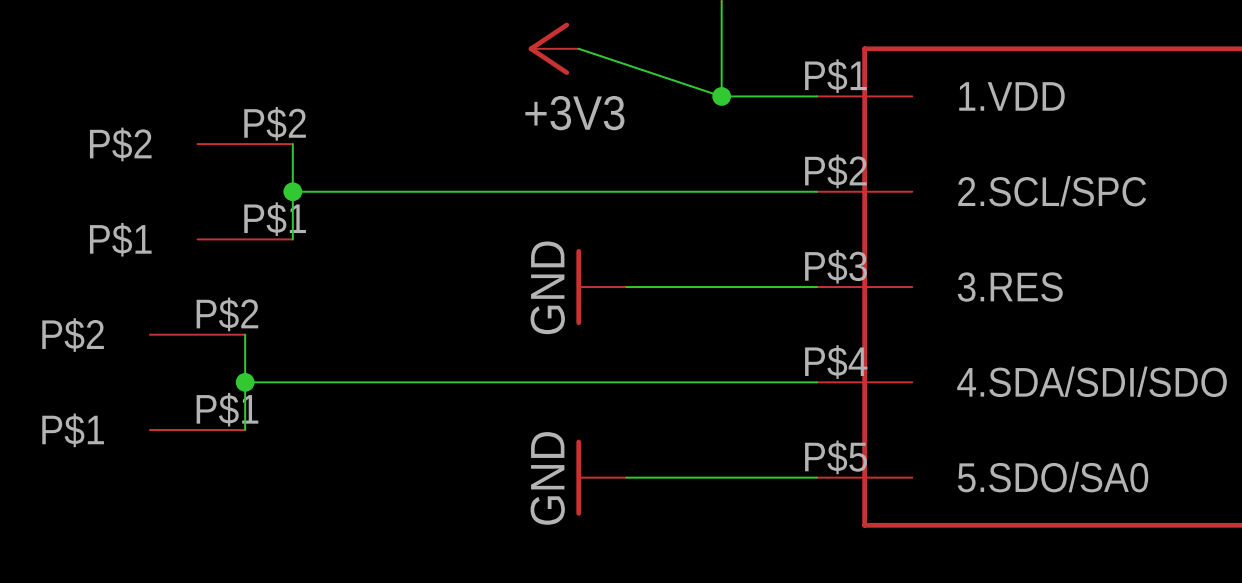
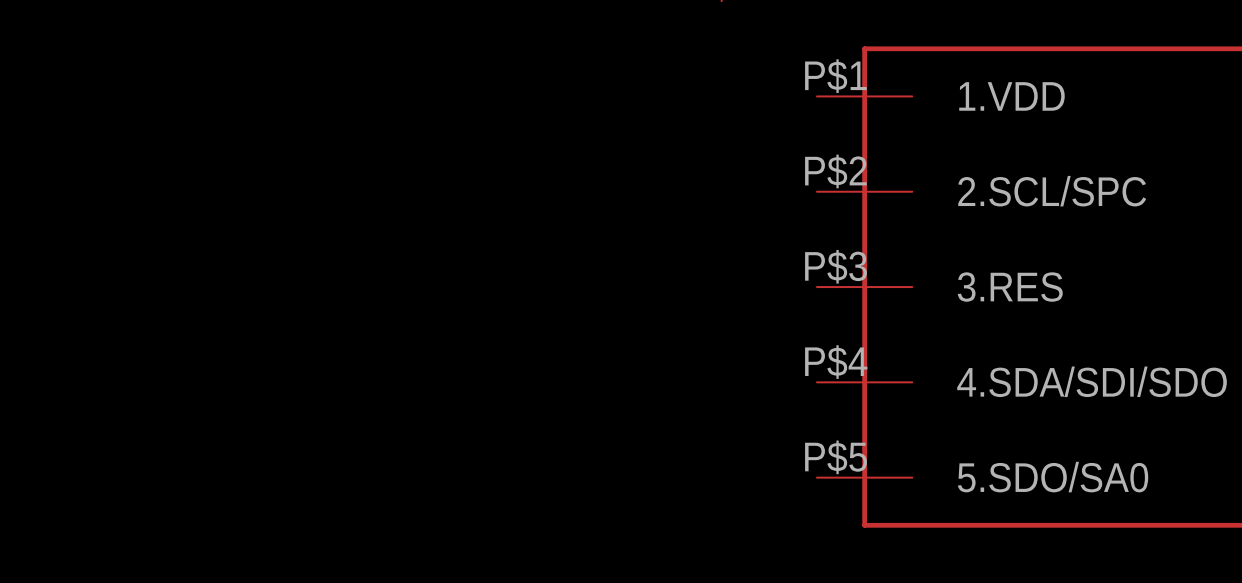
wire: (721, 1) (721, 96) -> none
power symbol: +3V3 (553, 48) -> none
wire: (578, 48) (721, 96) -> none
wire: (721, 96) (816, 96) -> none
junction: (721, 96) -> none
wire: (292, 144) (292, 239) -> none
part: (245, 191) -> none
wire: (292, 191) (816, 191) -> none
junction: (292, 191) -> none
power symbol: GND (601, 287) -> none
wire: (626, 287) (816, 287) -> none
wire: (245, 334) (245, 430) -> none
part: (197, 382) -> none
wire: (245, 382) (816, 382) -> none
junction: (245, 382) -> none
power symbol: GND (601, 477) -> none
wire: (626, 477) (816, 477) -> none

